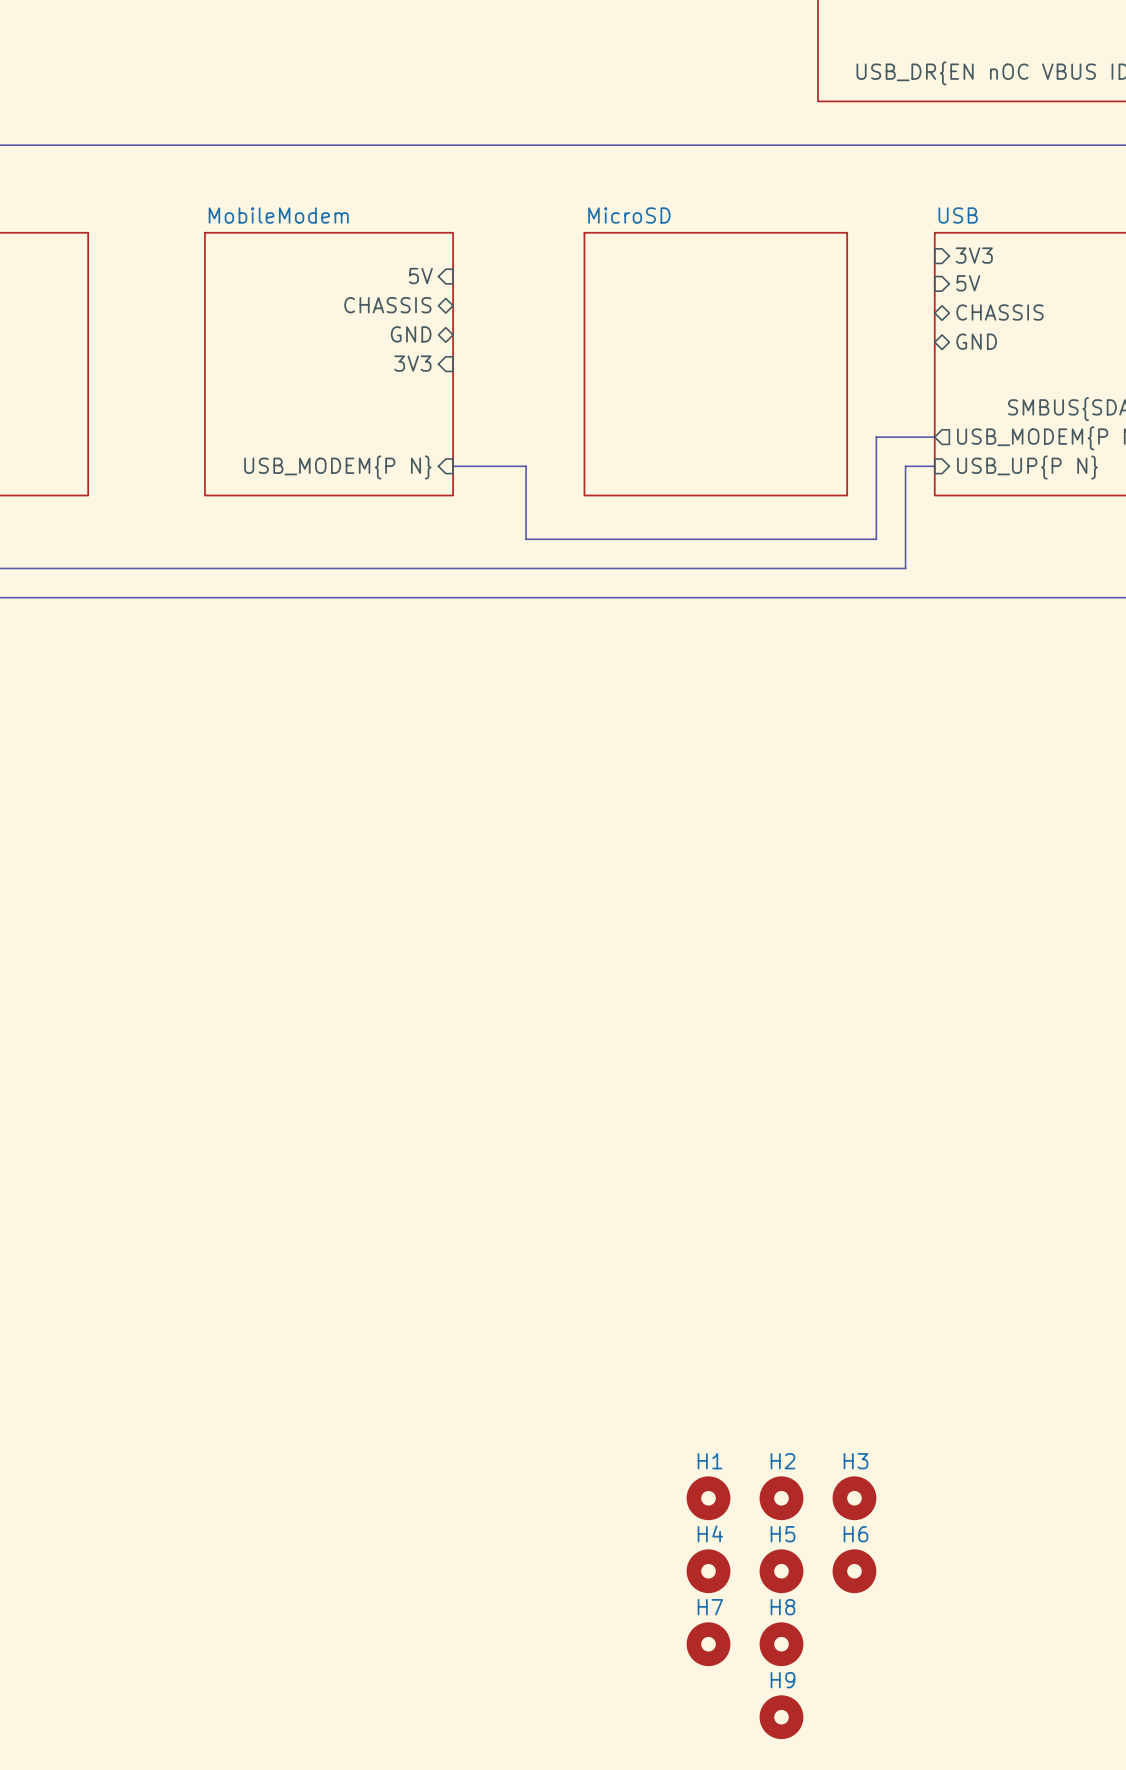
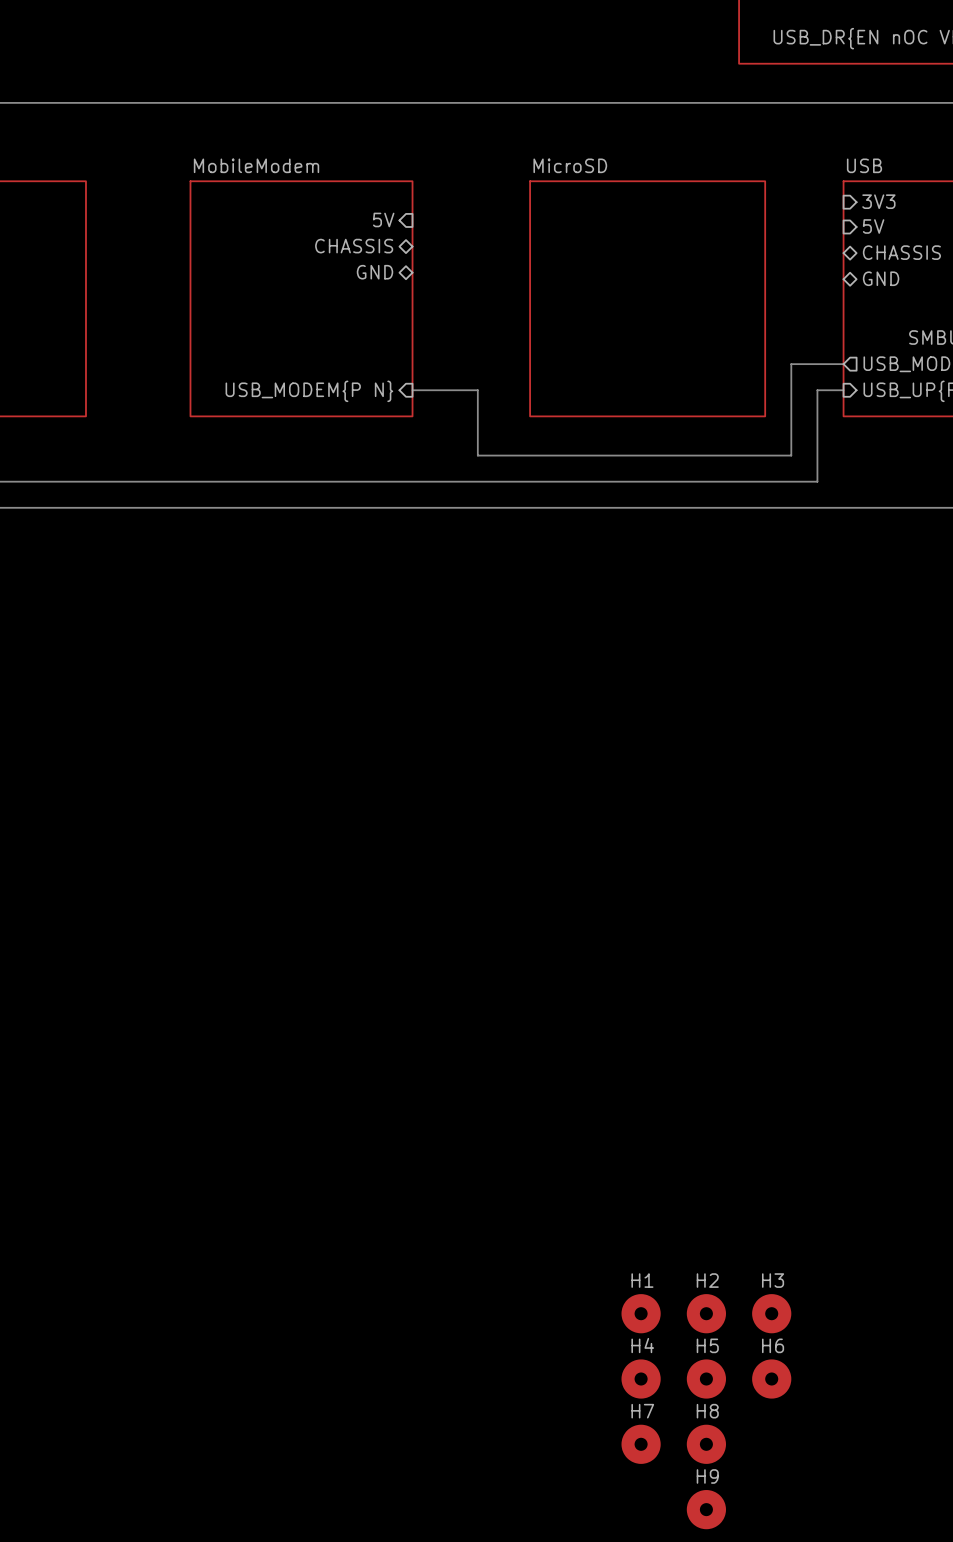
sheet pin: 3V3 (412, 363) -> none

